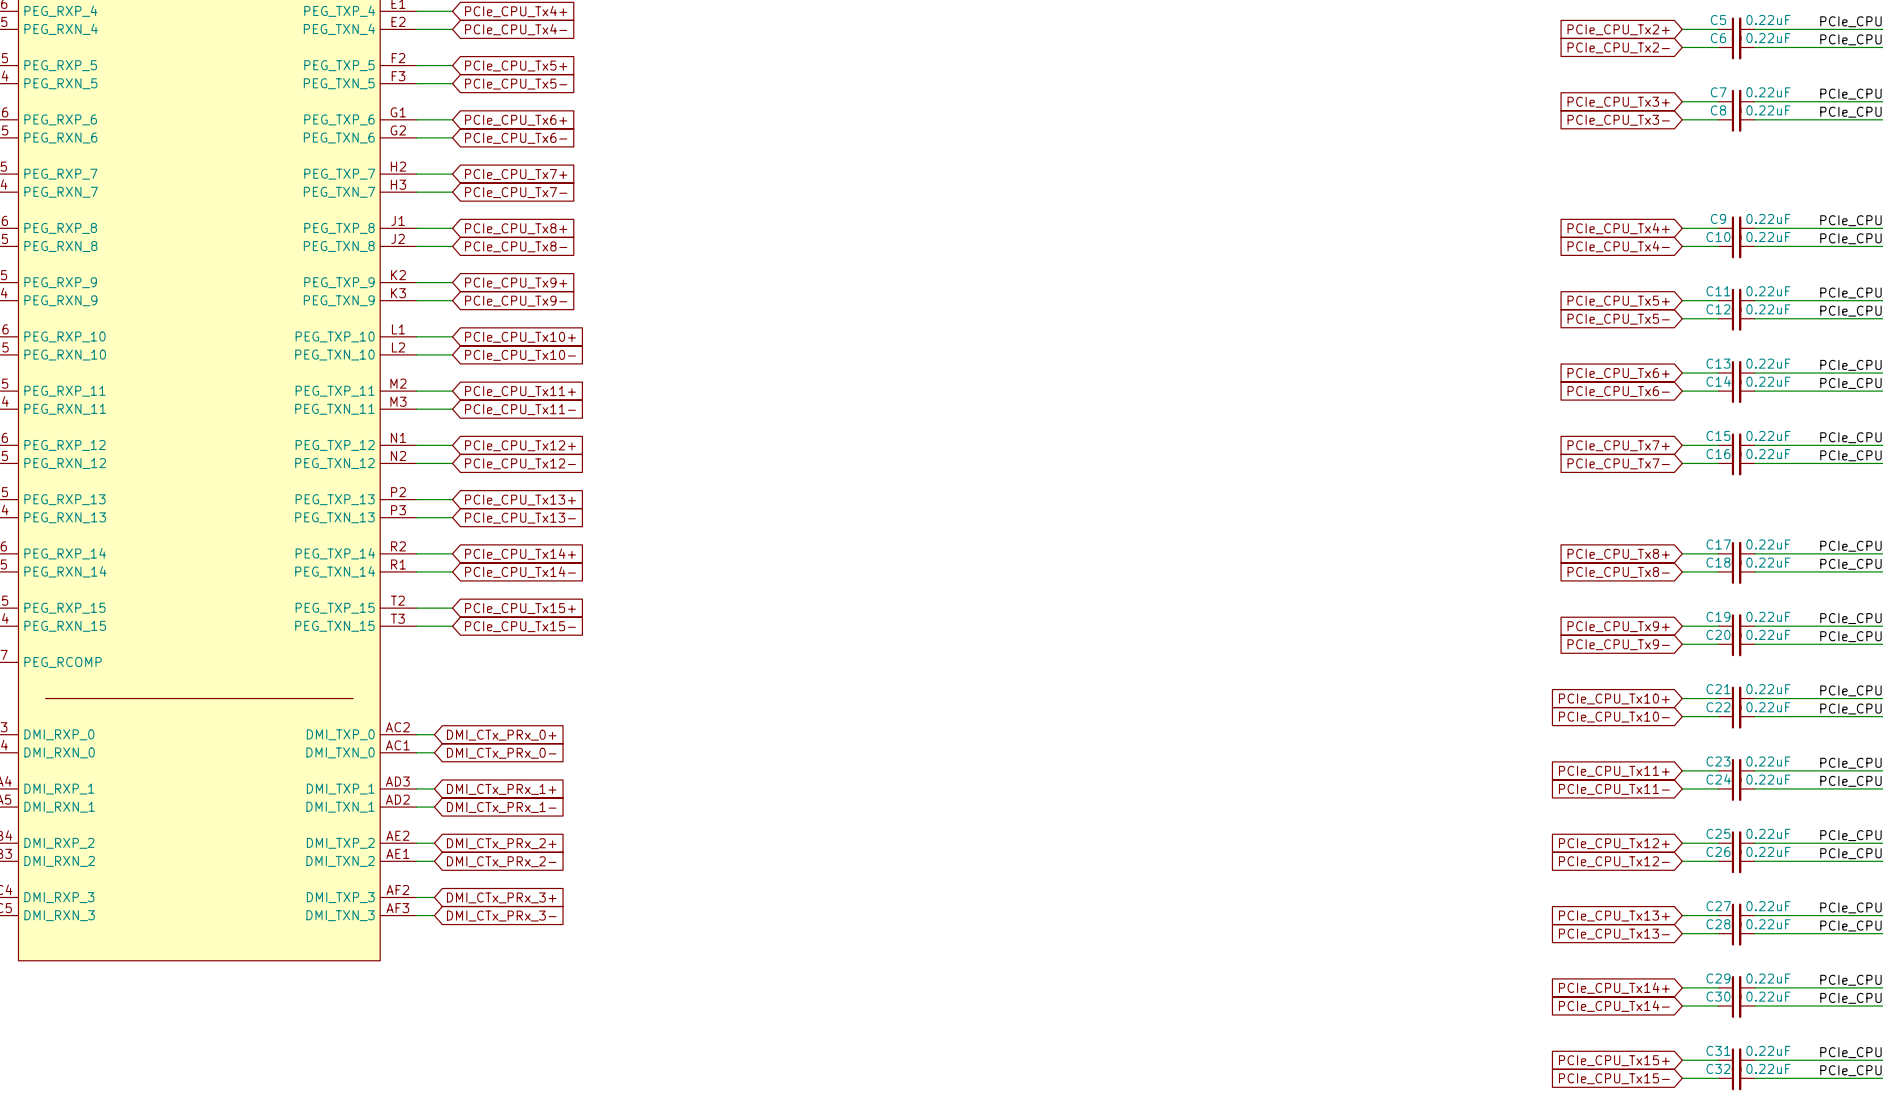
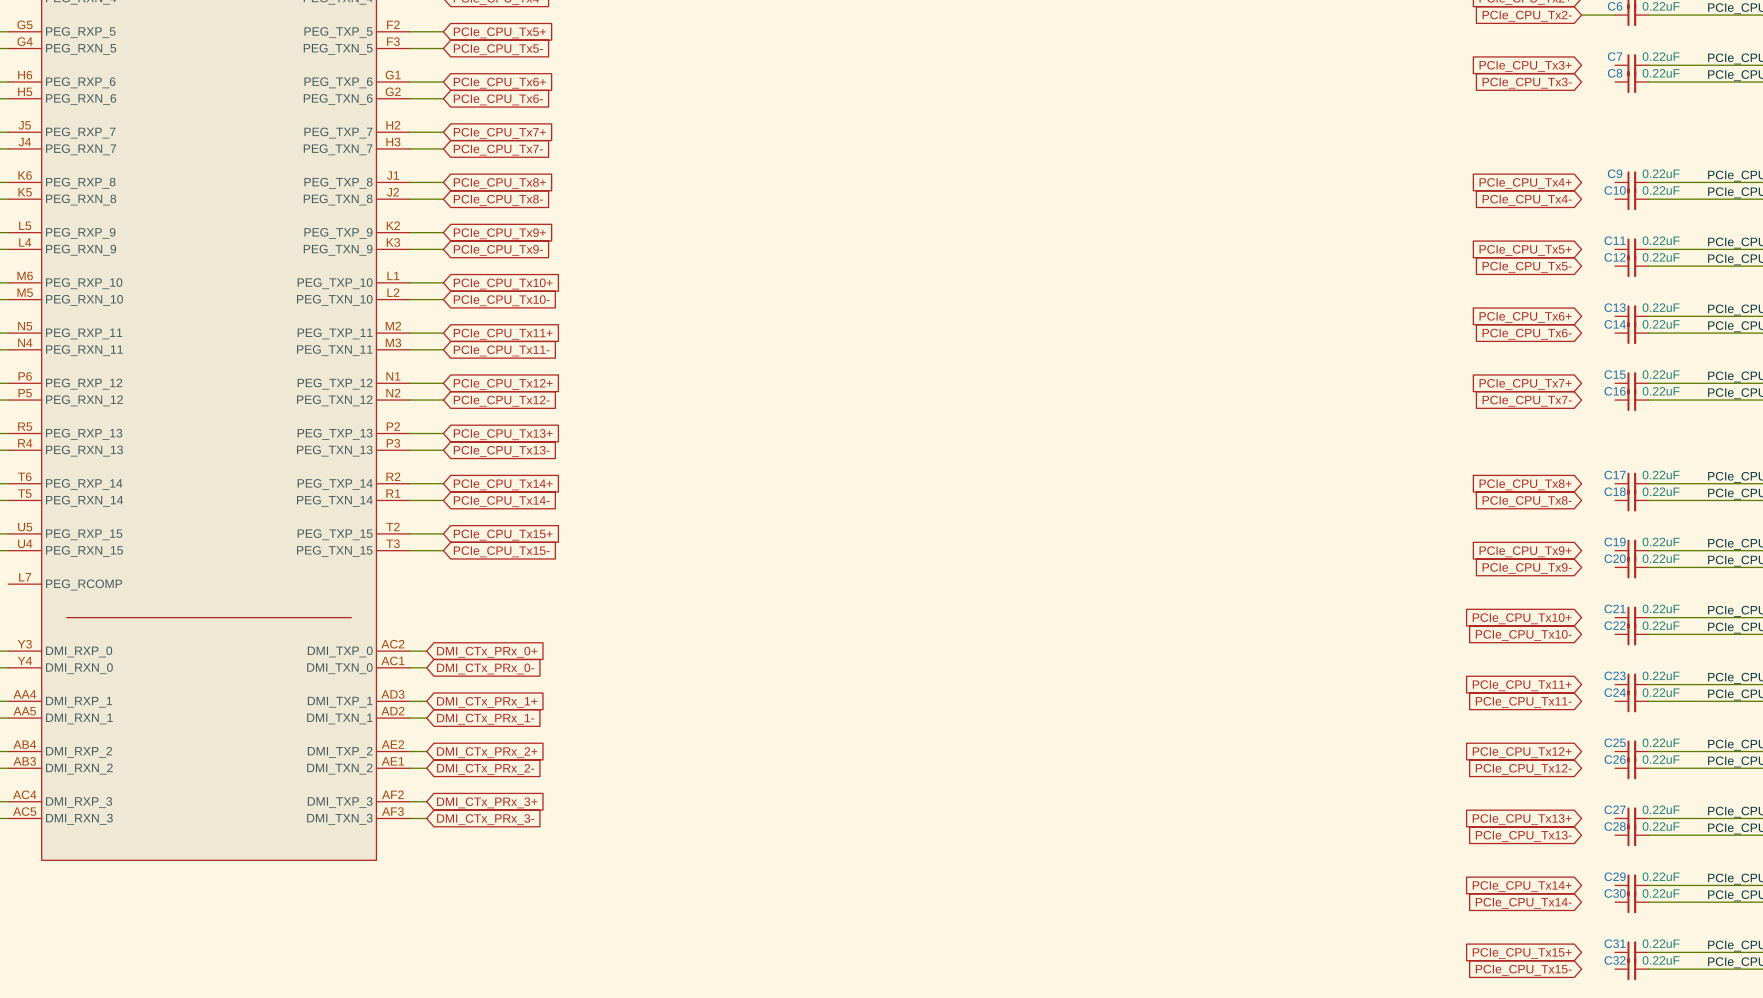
wire: (1682, 101) (1718, 101) -> none
wire: (1682, 119) (1718, 119) -> none
wire: (1682, 228) (1718, 228) -> none
wire: (1682, 246) (1718, 246) -> none
wire: (1682, 300) (1718, 300) -> none
wire: (1682, 318) (1718, 318) -> none
wire: (1682, 373) (1718, 373) -> none
wire: (1682, 391) (1718, 391) -> none
wire: (1682, 445) (1718, 445) -> none
wire: (1682, 463) (1718, 463) -> none
wire: (1682, 553) (1718, 553) -> none
wire: (1682, 571) (1718, 571) -> none
wire: (1682, 626) (1718, 626) -> none
wire: (1682, 644) (1718, 644) -> none
wire: (1682, 698) (1718, 698) -> none
wire: (1682, 716) (1718, 716) -> none
wire: (1682, 770) (1718, 770) -> none
wire: (1682, 788) (1718, 788) -> none
wire: (1682, 843) (1718, 843) -> none
wire: (1682, 861) (1718, 861) -> none
wire: (1682, 915) (1718, 915) -> none
wire: (1682, 933) (1718, 933) -> none
wire: (1682, 987) (1718, 987) -> none
wire: (1682, 1005) (1718, 1005) -> none
wire: (1682, 1060) (1718, 1060) -> none
wire: (1682, 1078) (1718, 1078) -> none

